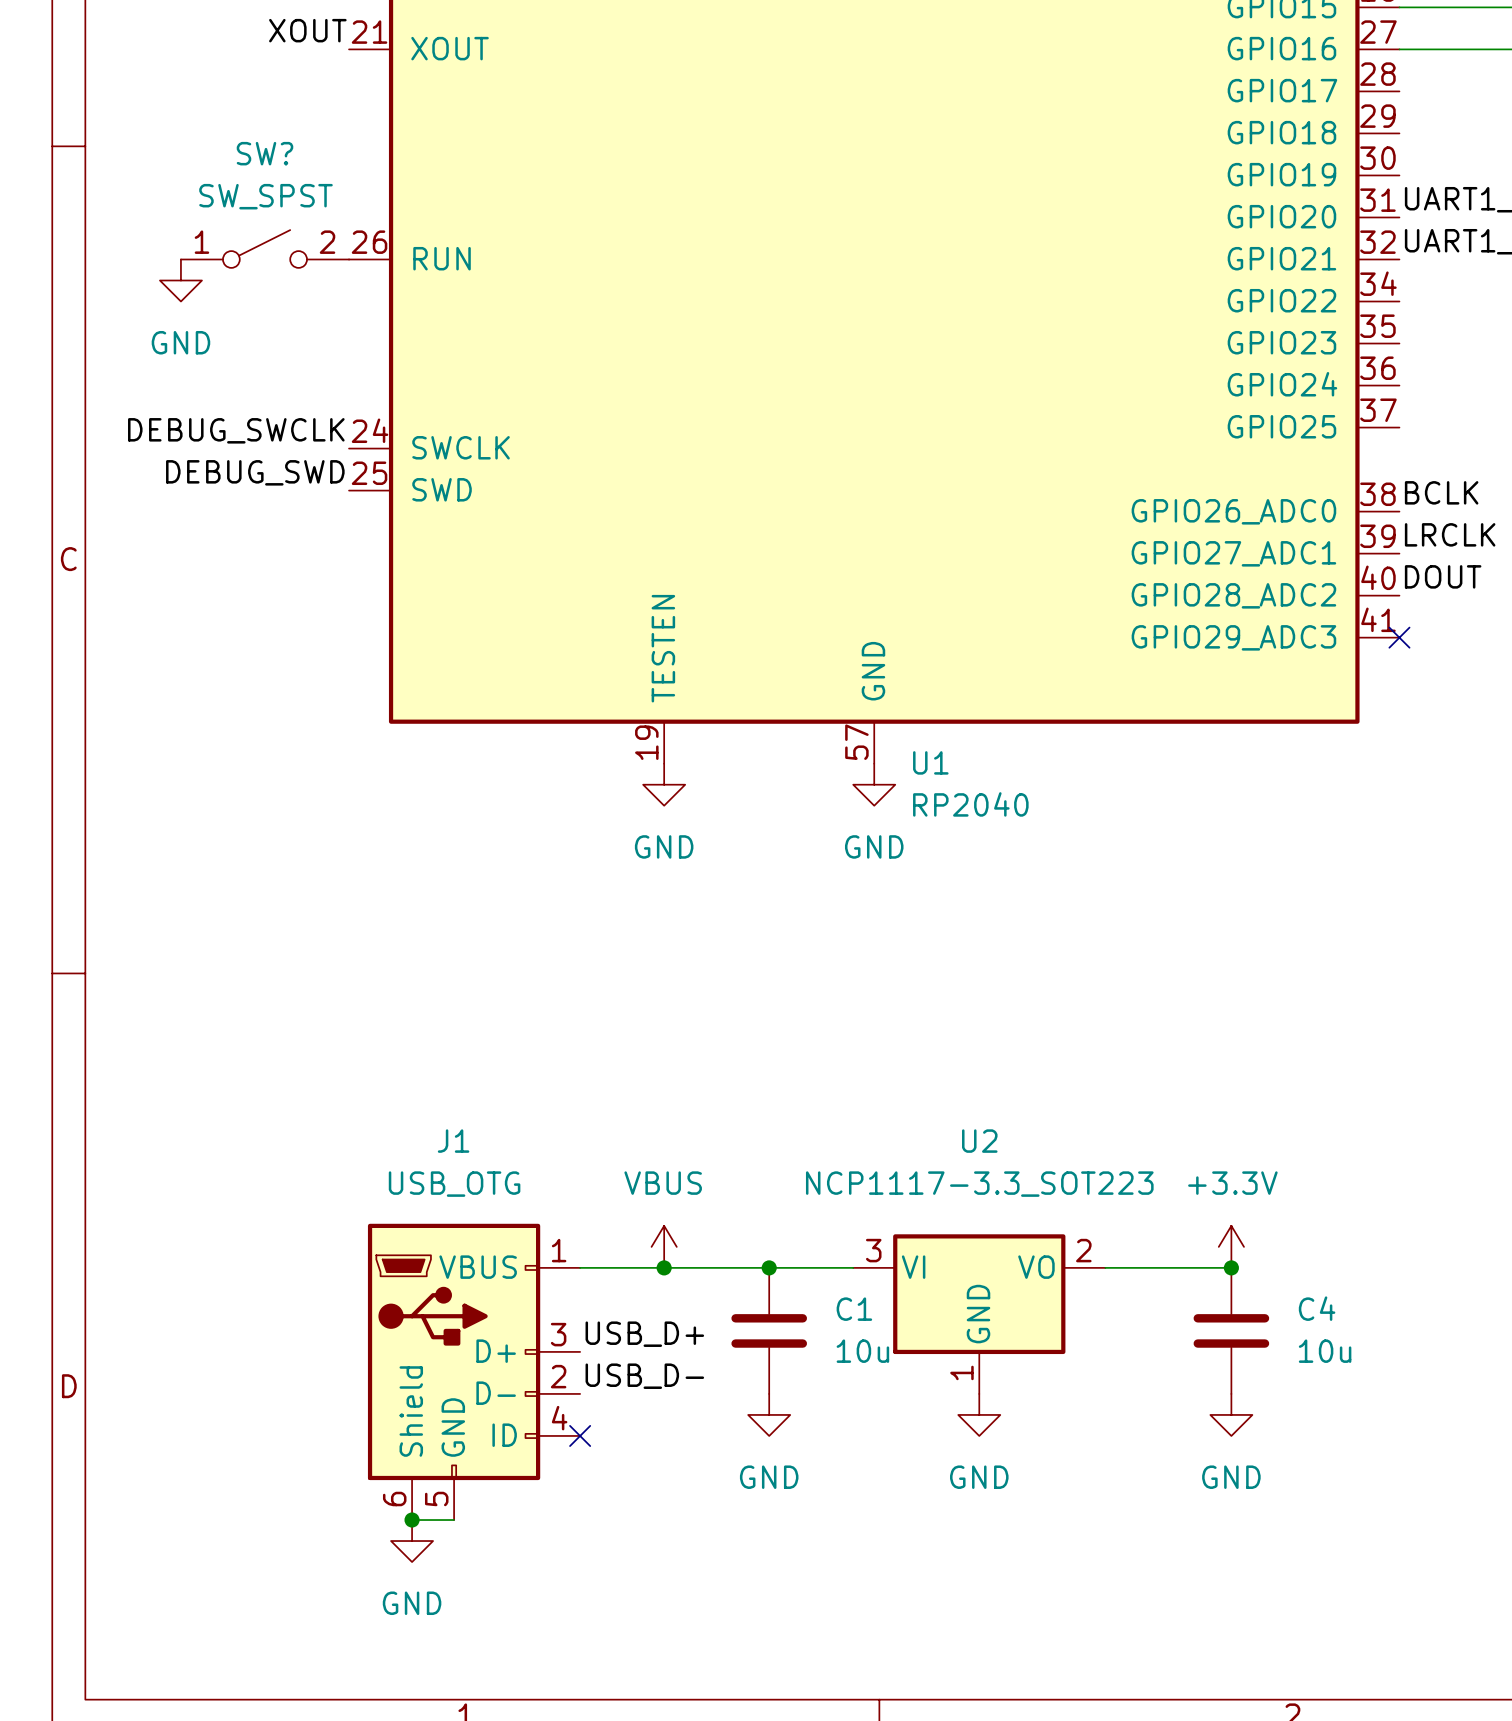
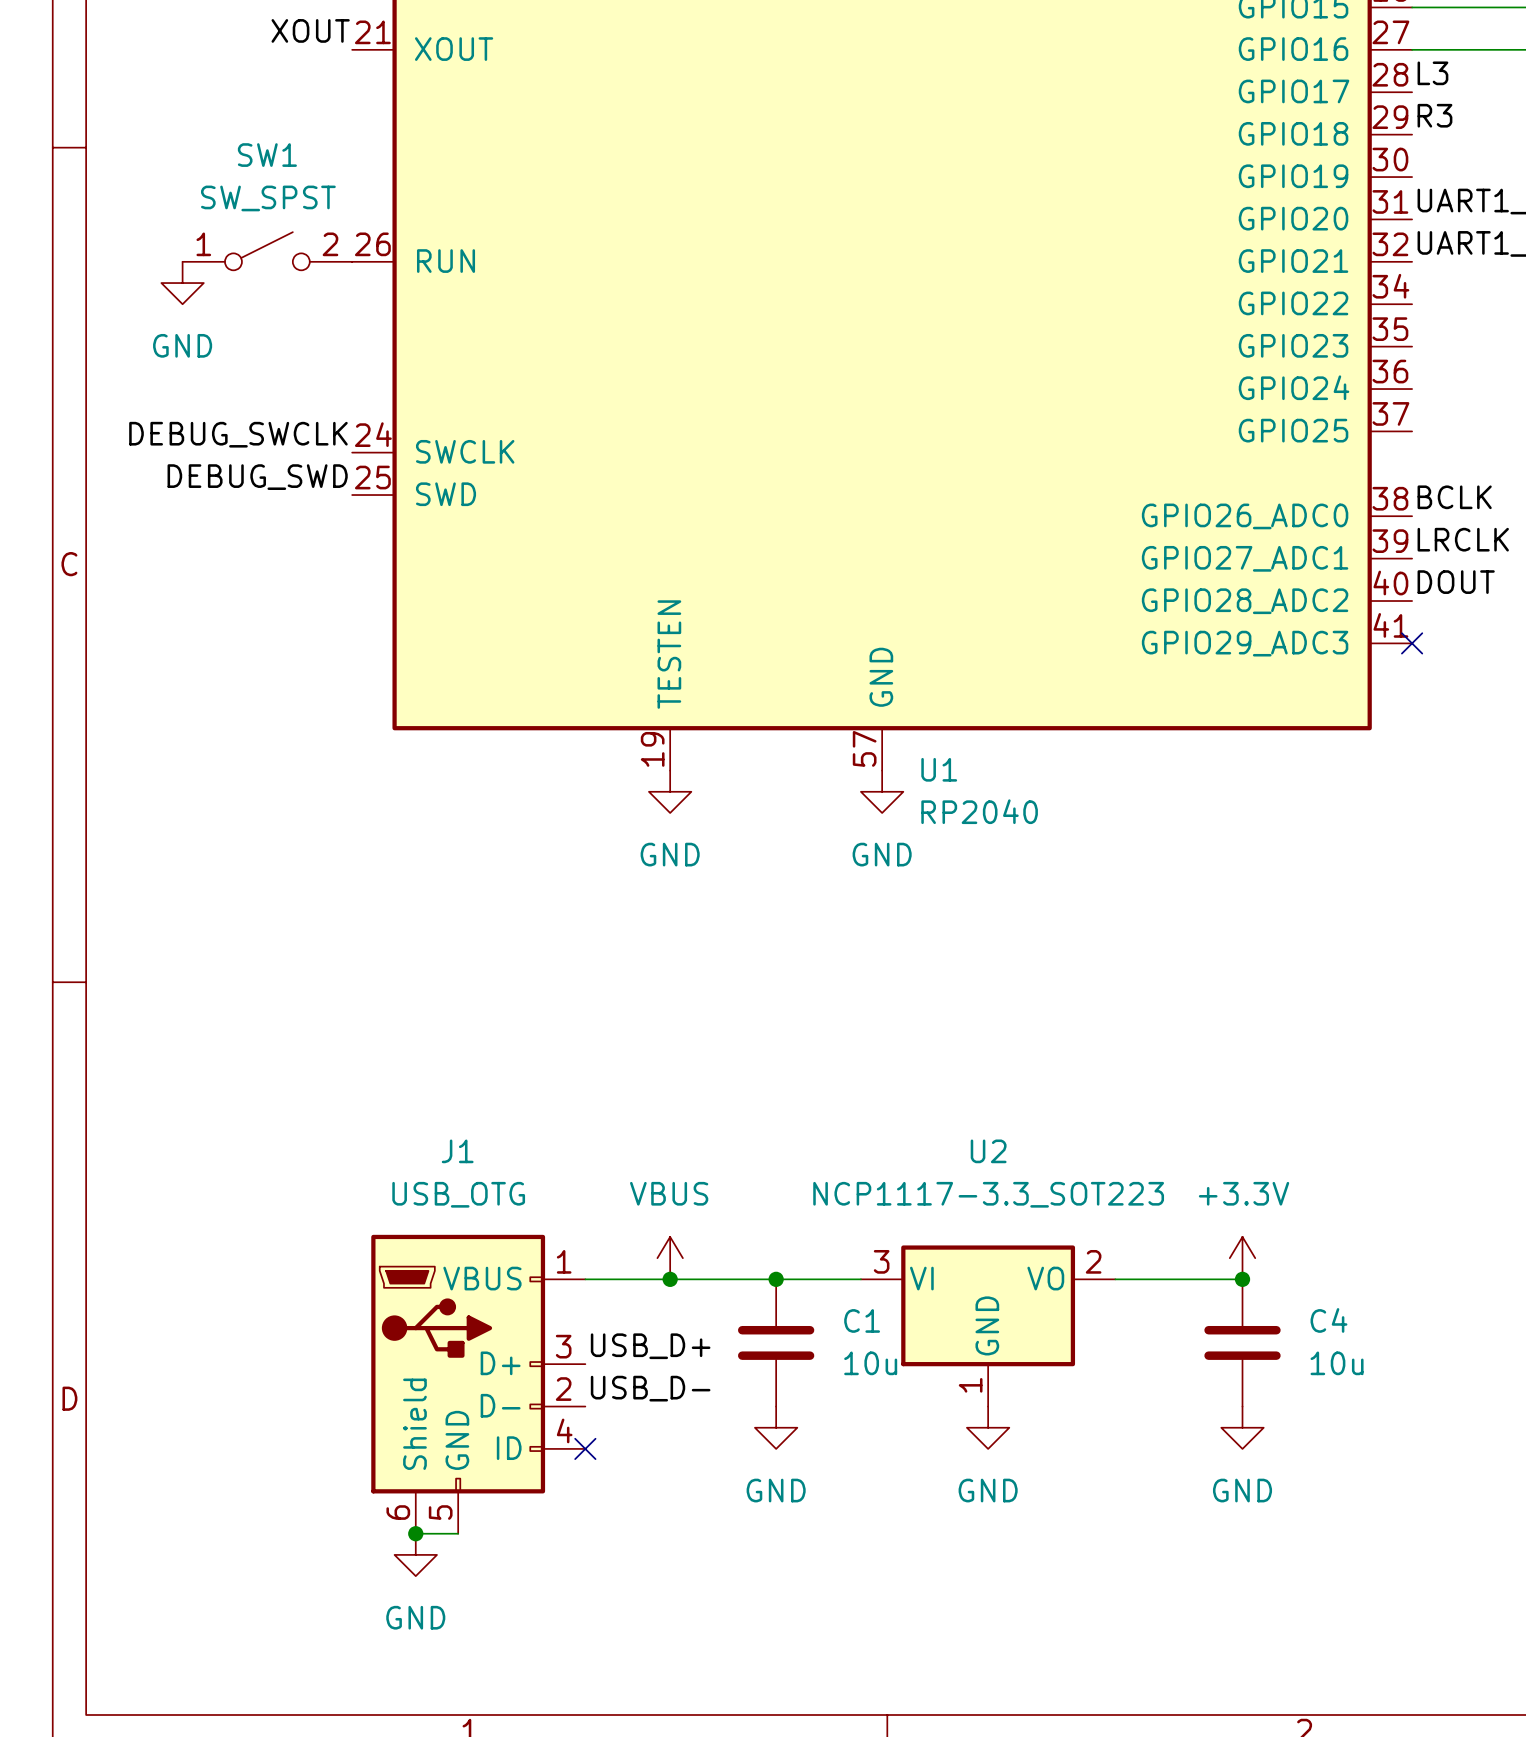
label: none -> L3 (1432, 73)
label: none -> R3 (1434, 115)
SW? name: SW? (264, 153) -> SW1 (267, 155)

